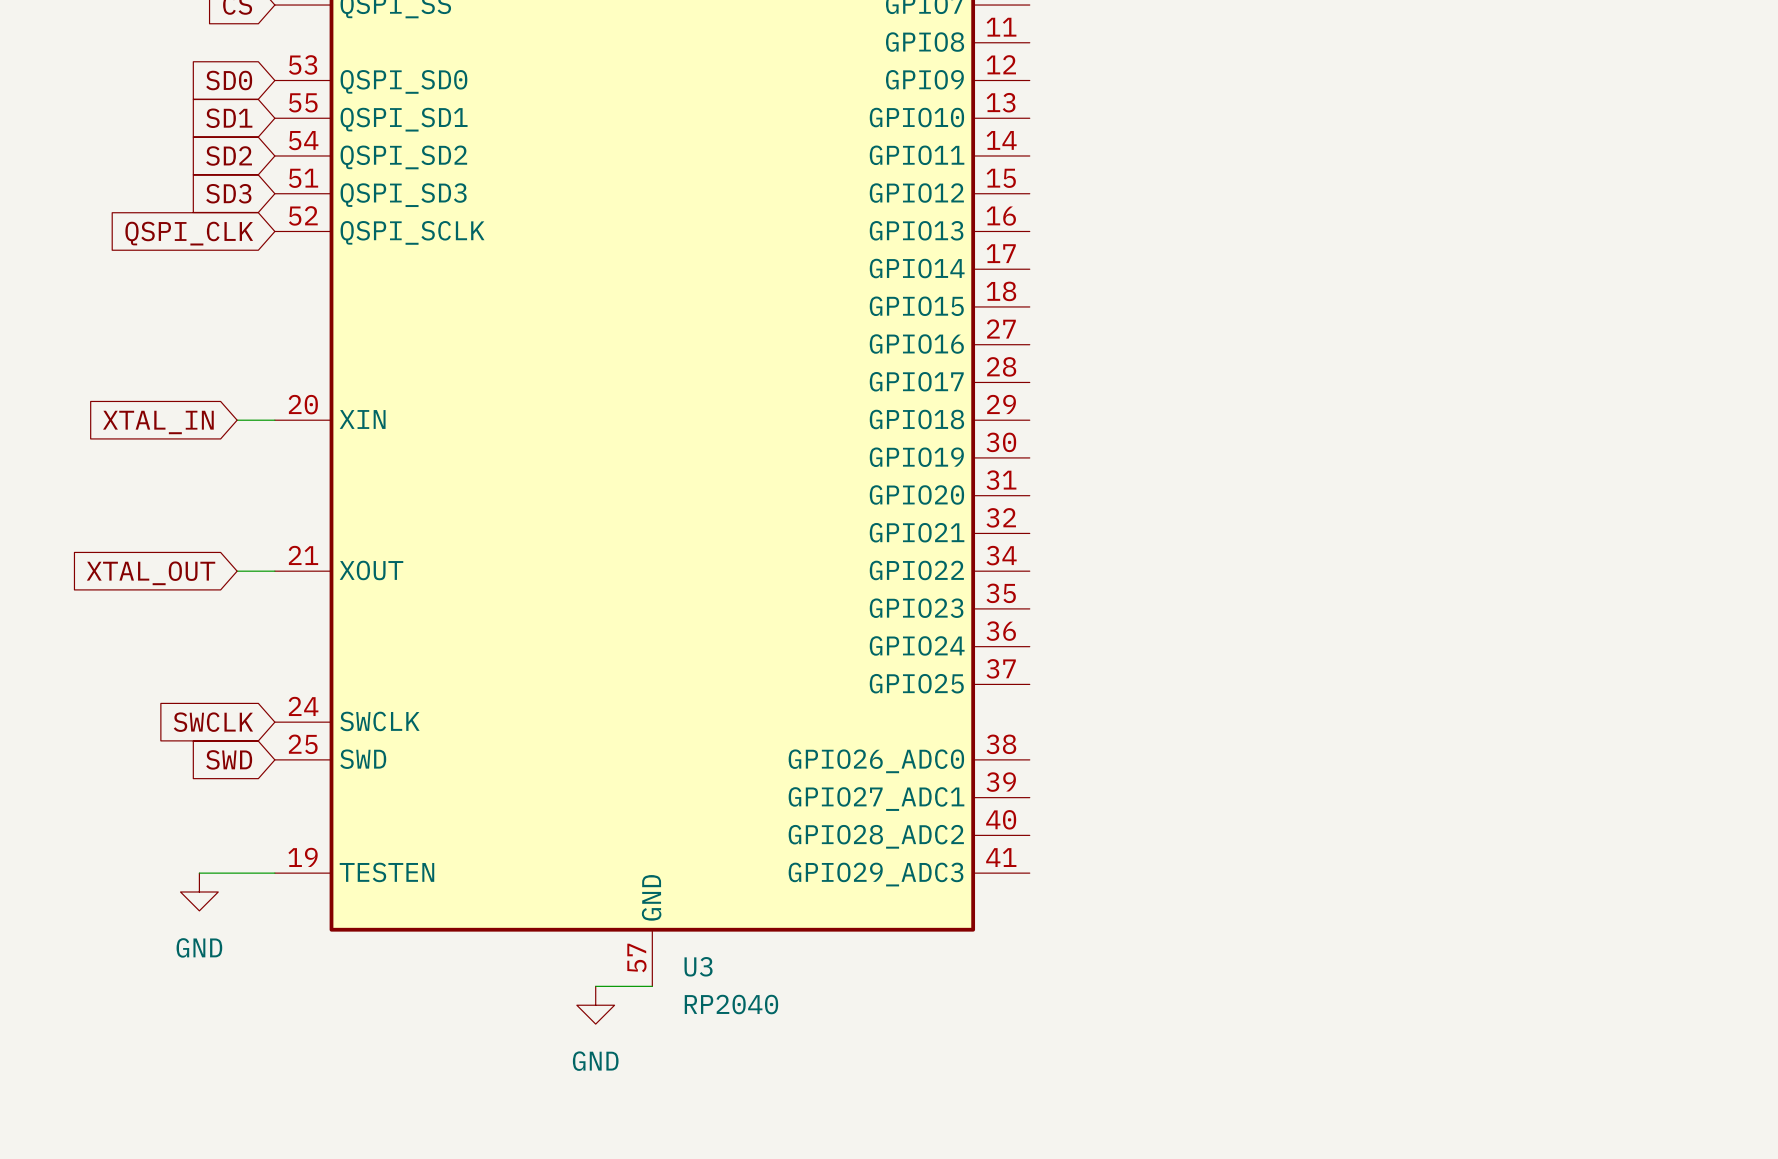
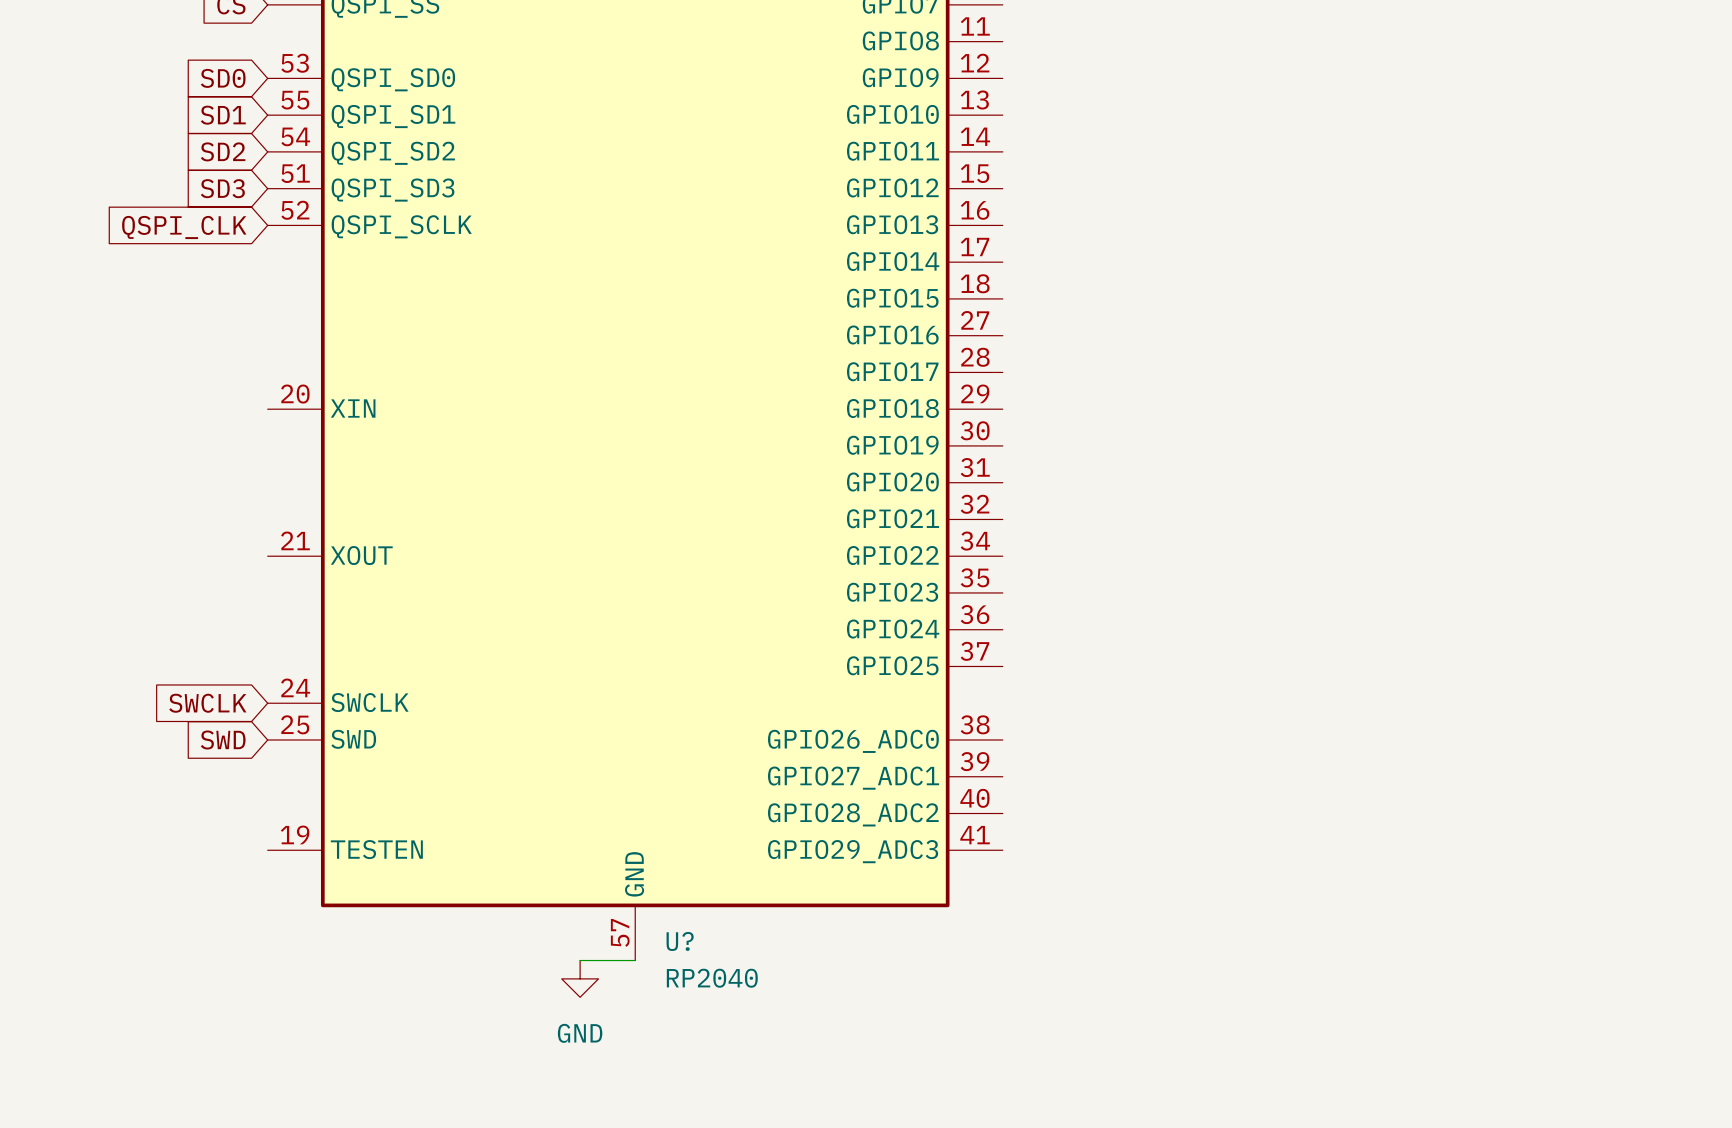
wire: (237, 420) (274, 420) -> none
global label: XTAL_IN (158, 422) -> none
wire: (237, 571) (274, 571) -> none
global label: XTAL_OUT (151, 573) -> none
wire: (199, 873) (274, 873) -> none
power symbol: GND (199, 892) -> none
U3 name: U3 (698, 966) -> U? (680, 941)

